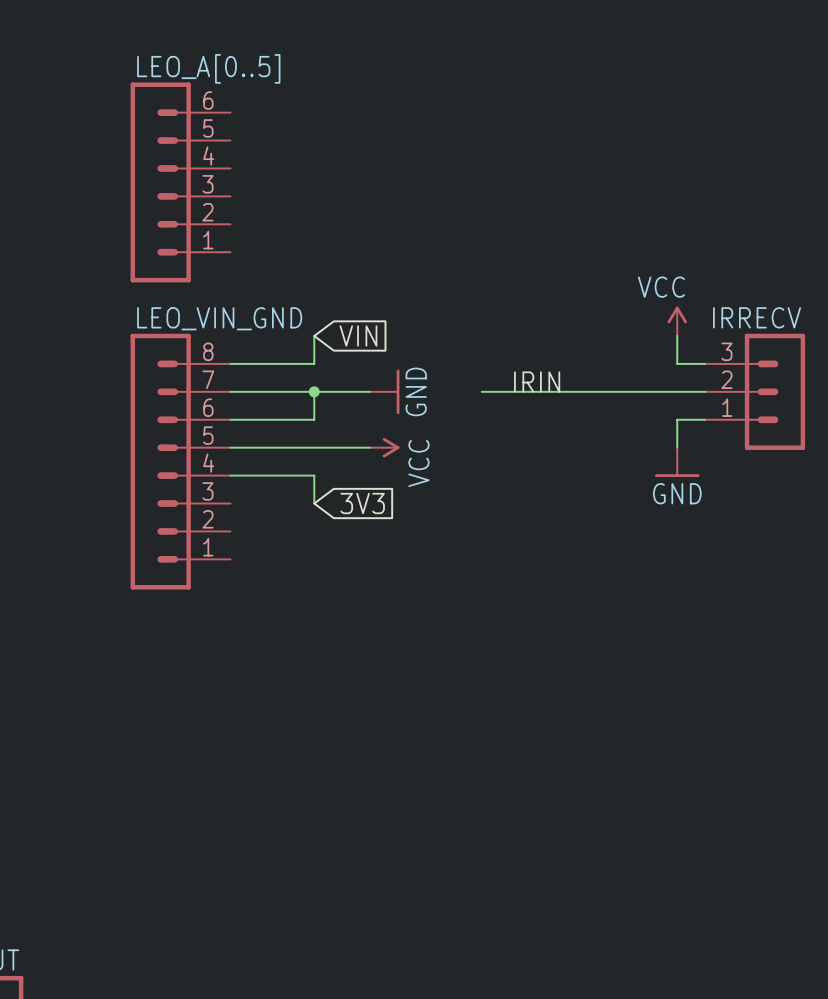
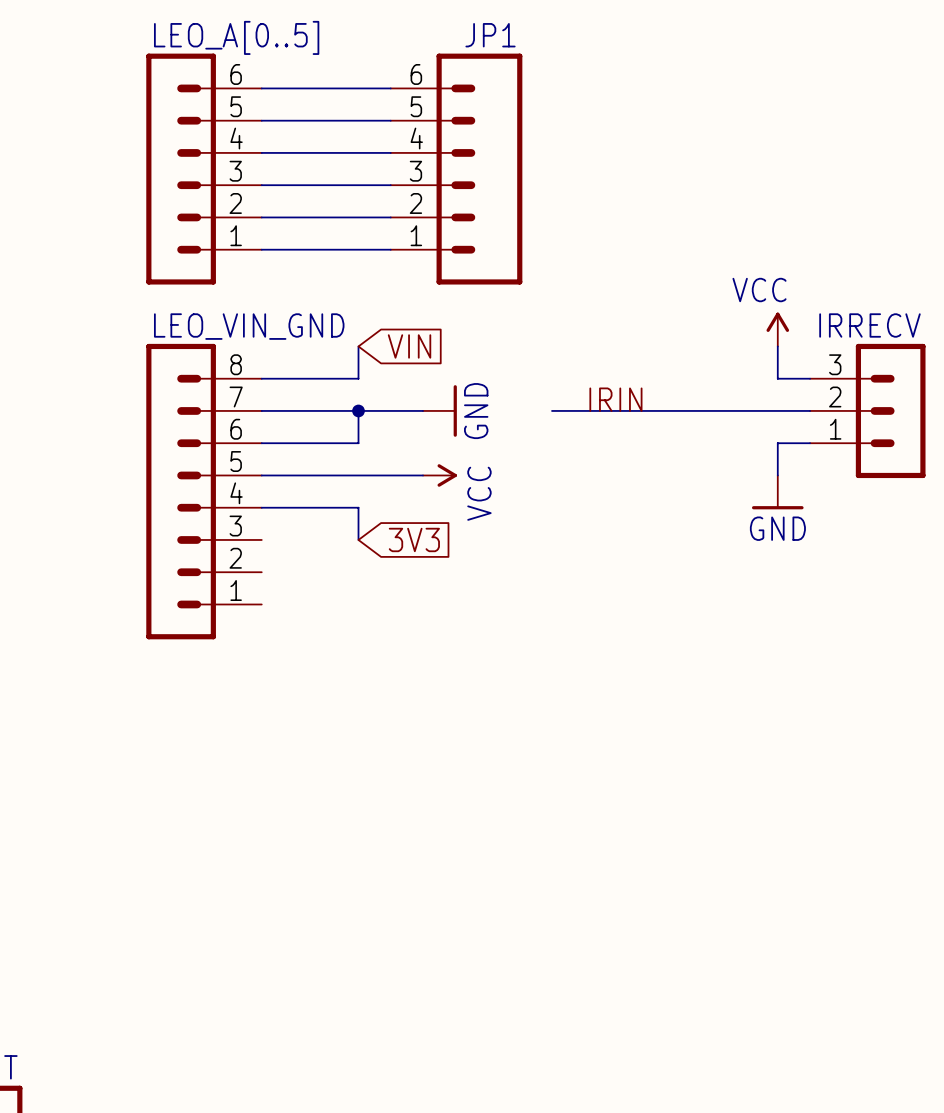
wire: none -> (261, 88) (390, 88)
wire: none -> (261, 120) (390, 120)
wire: none -> (261, 152) (390, 152)
JP1: none -> (456, 169)
wire: none -> (261, 185) (390, 185)
wire: none -> (261, 217) (390, 217)
wire: none -> (261, 249) (390, 249)

